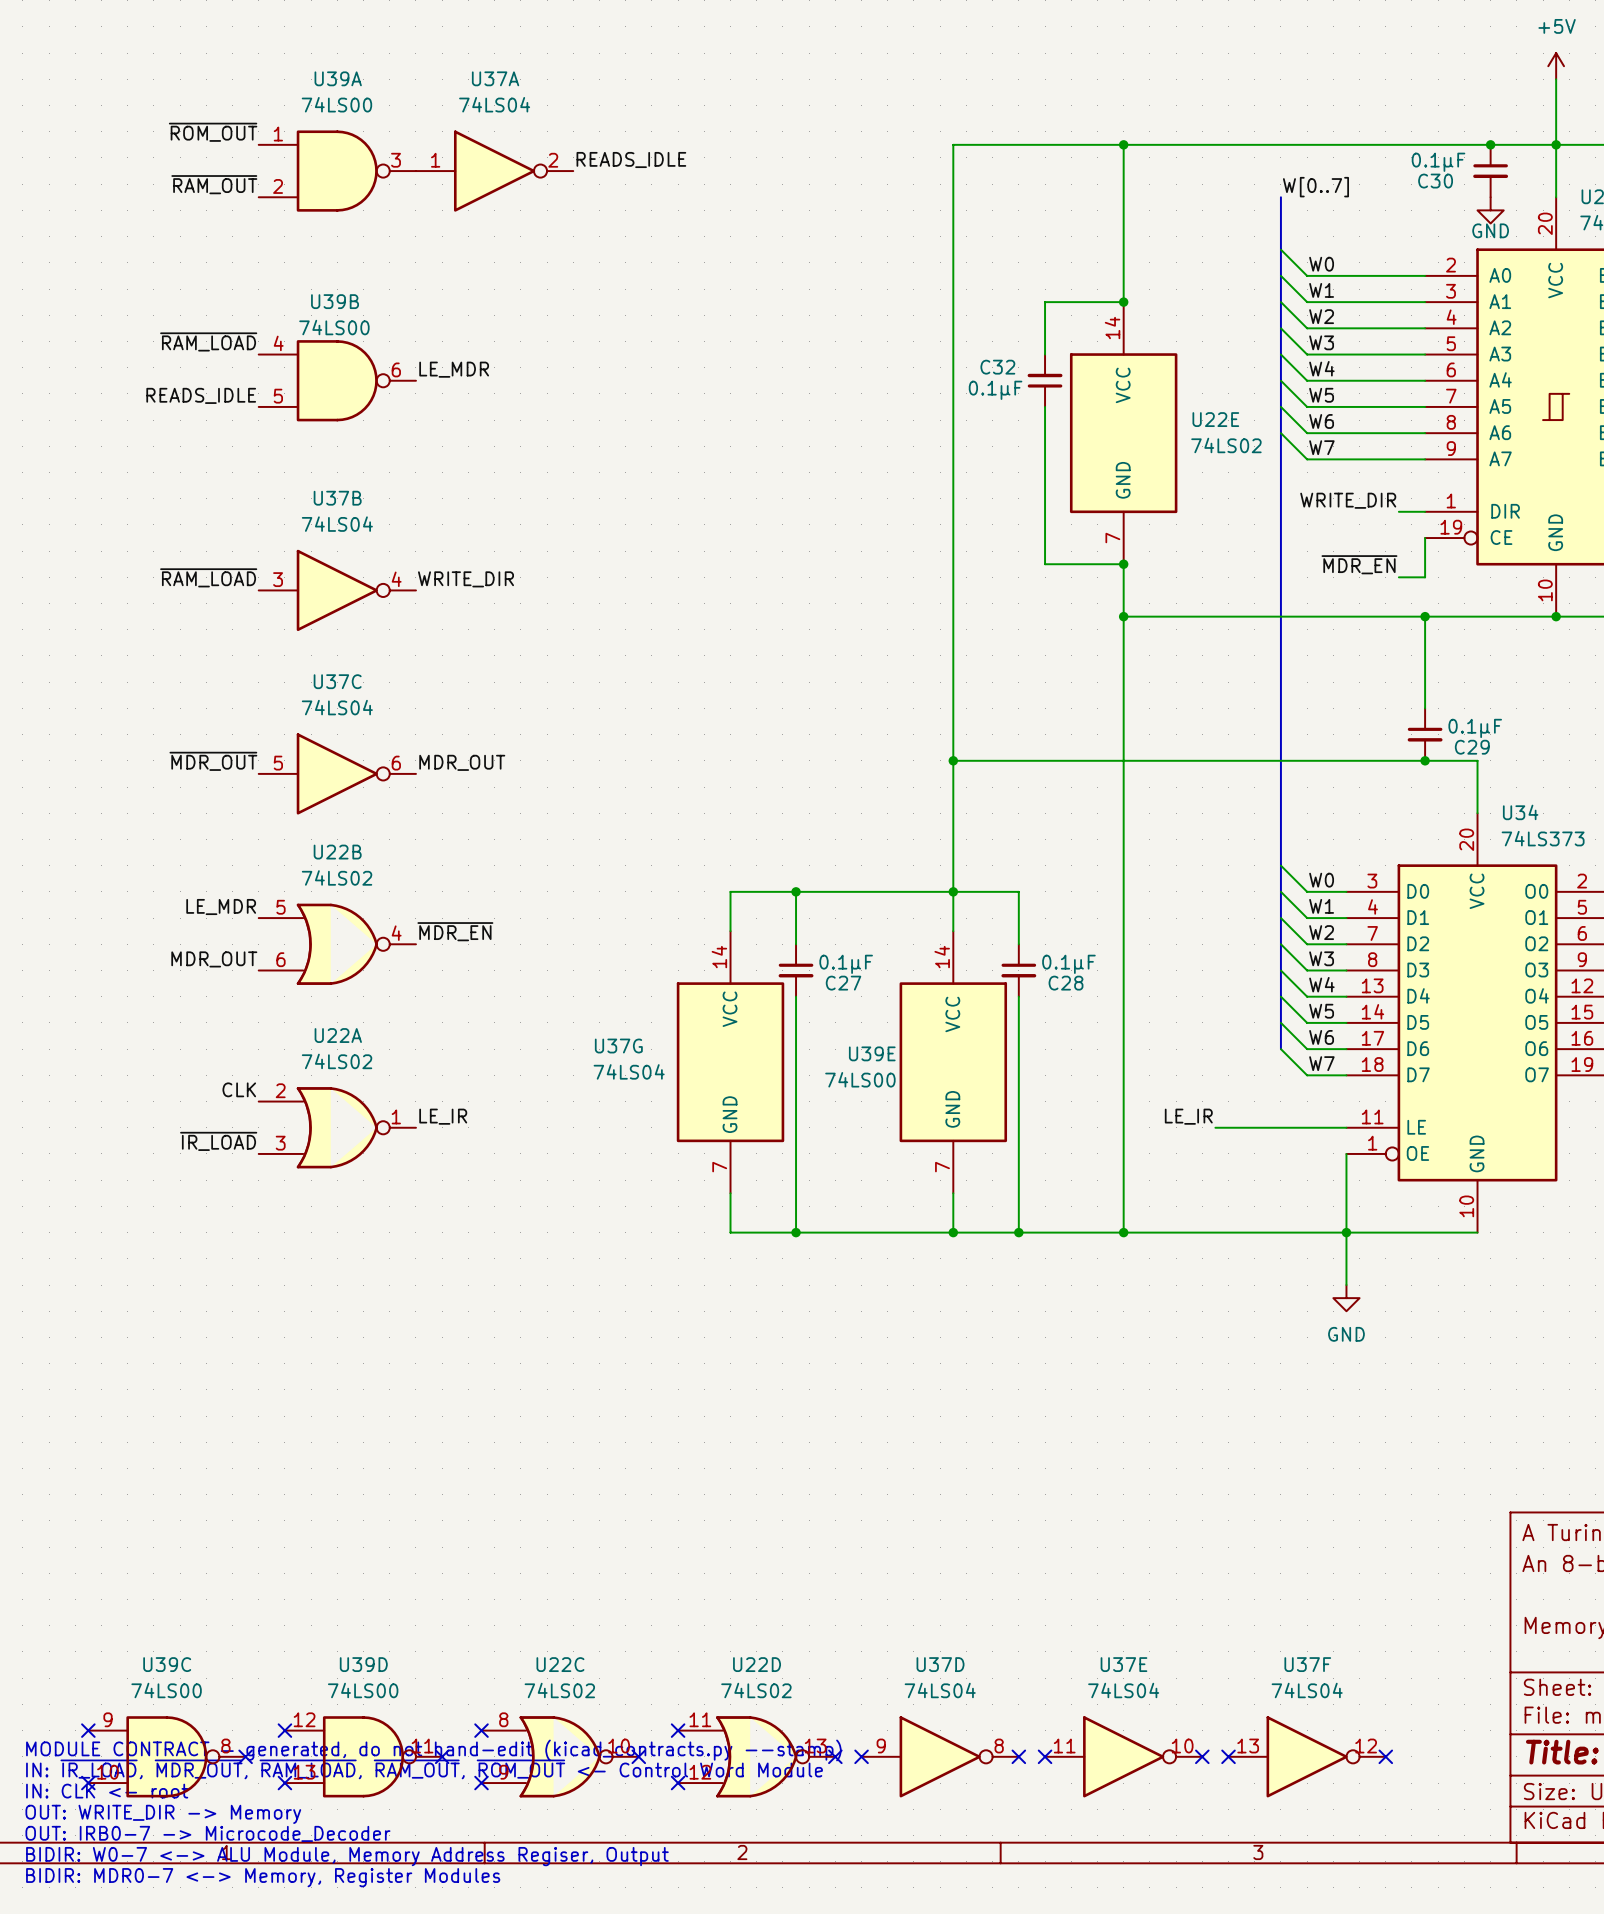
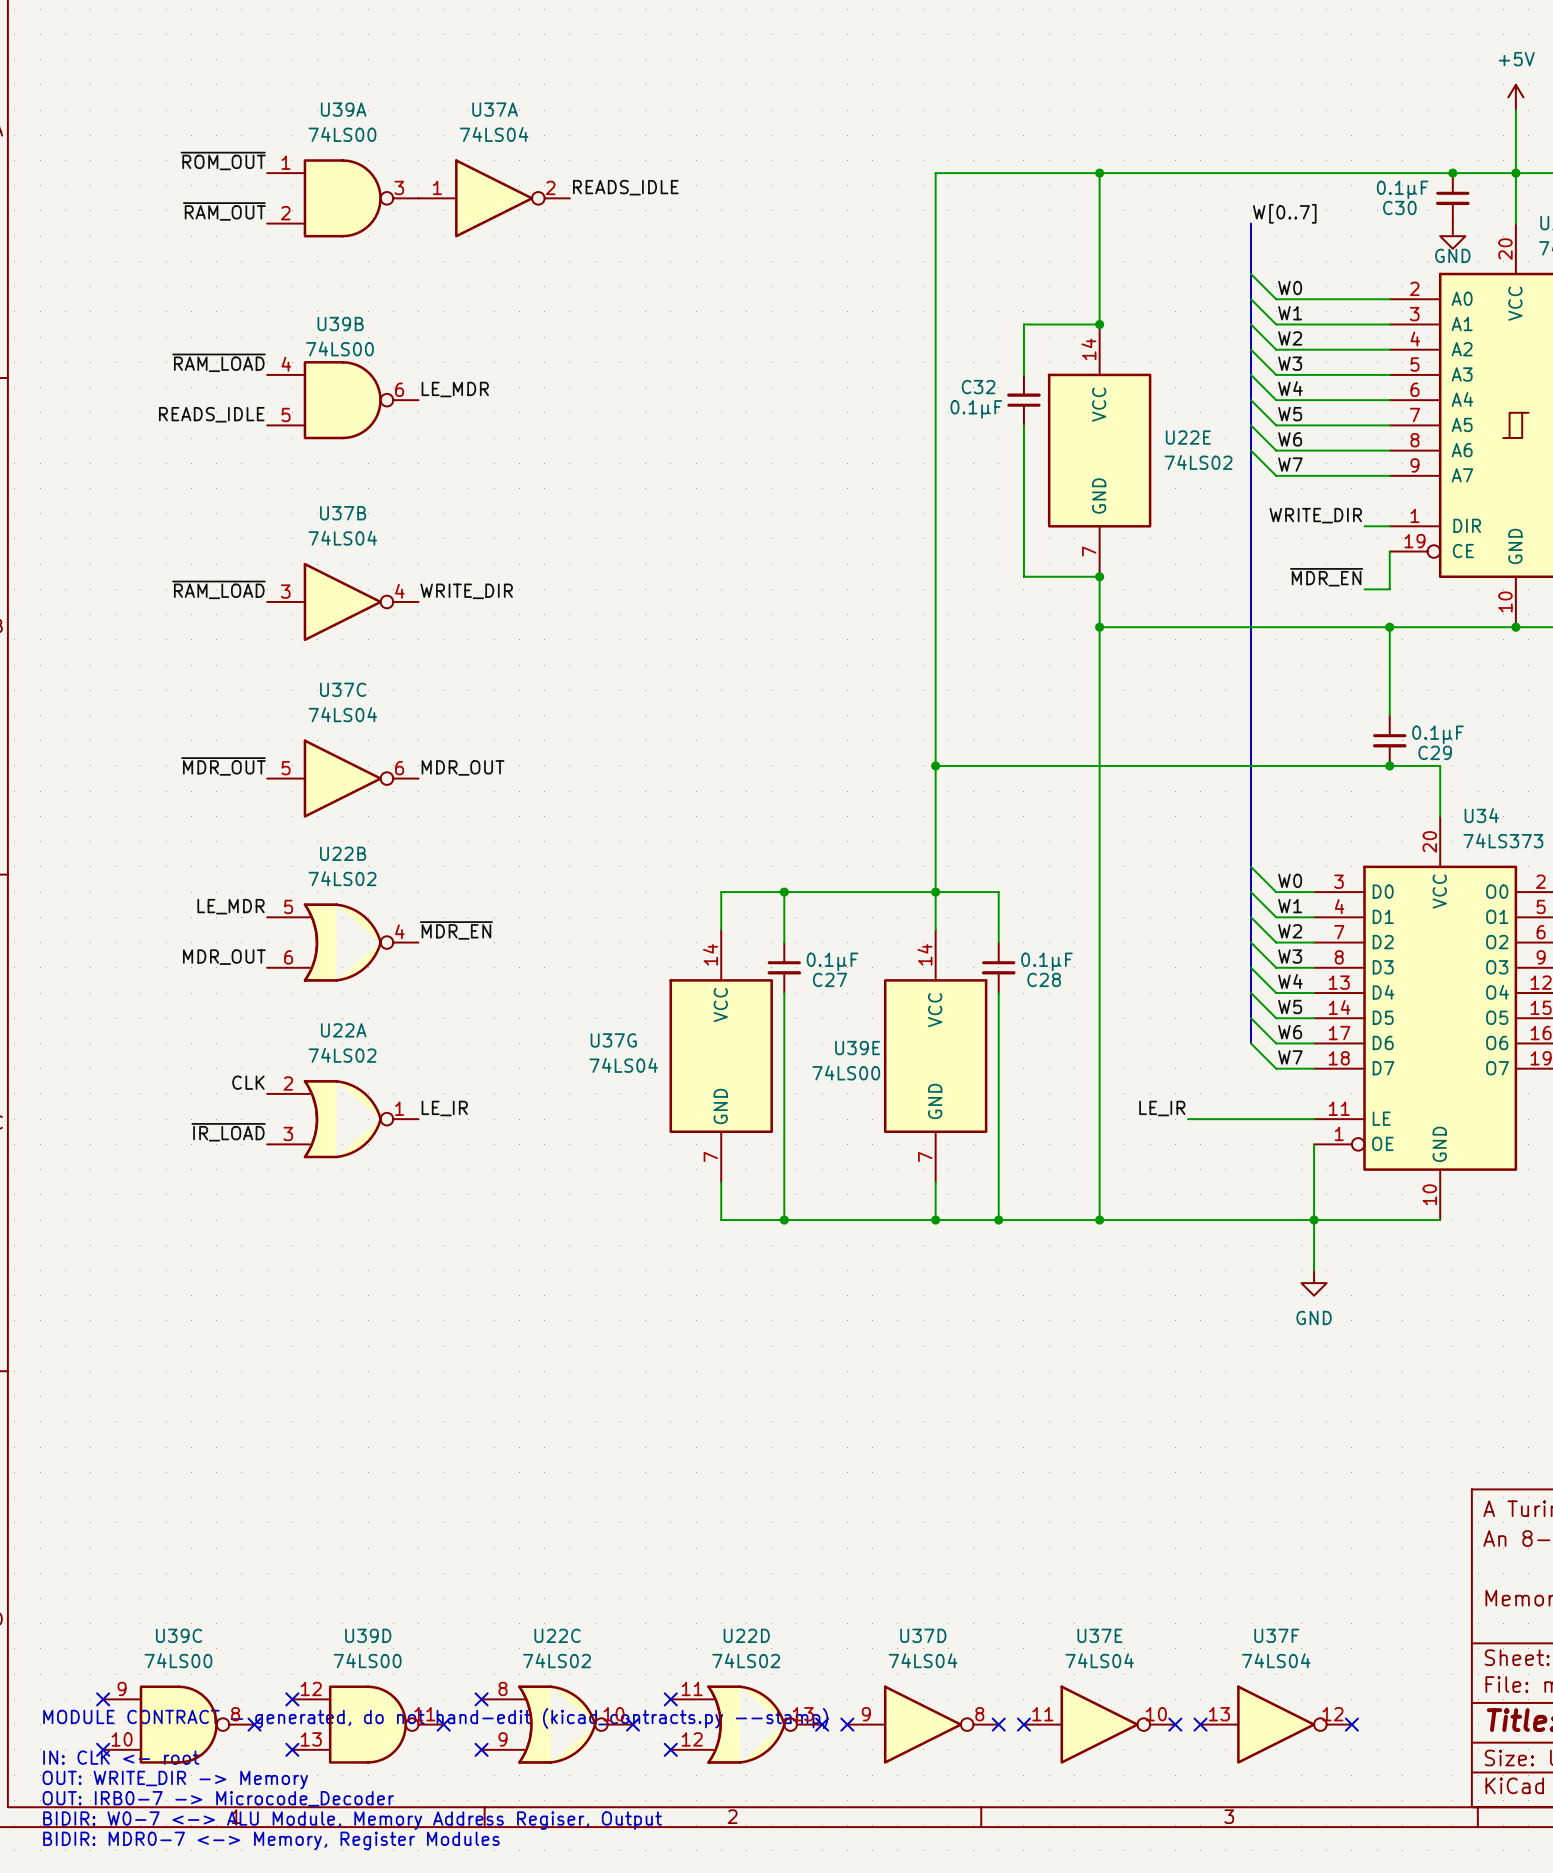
text: IN: ~{IR_LOAD}, ~{MDR_OUT}, ~{RAM_LOAD}, ~{RAM_OUT}, ~{ROM_OUT} <- Control Word Module (424, 1769) -> none

